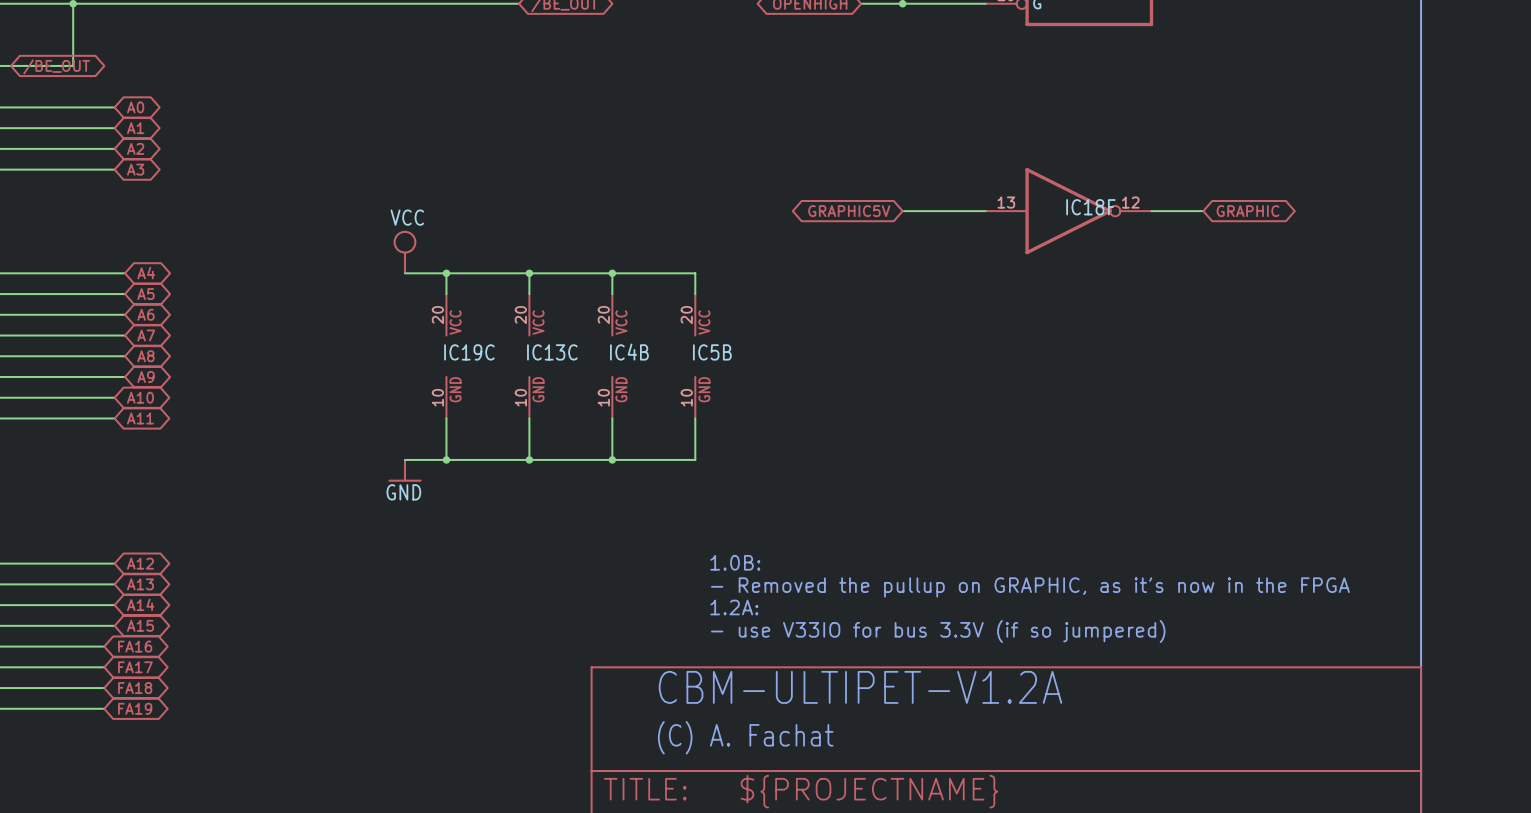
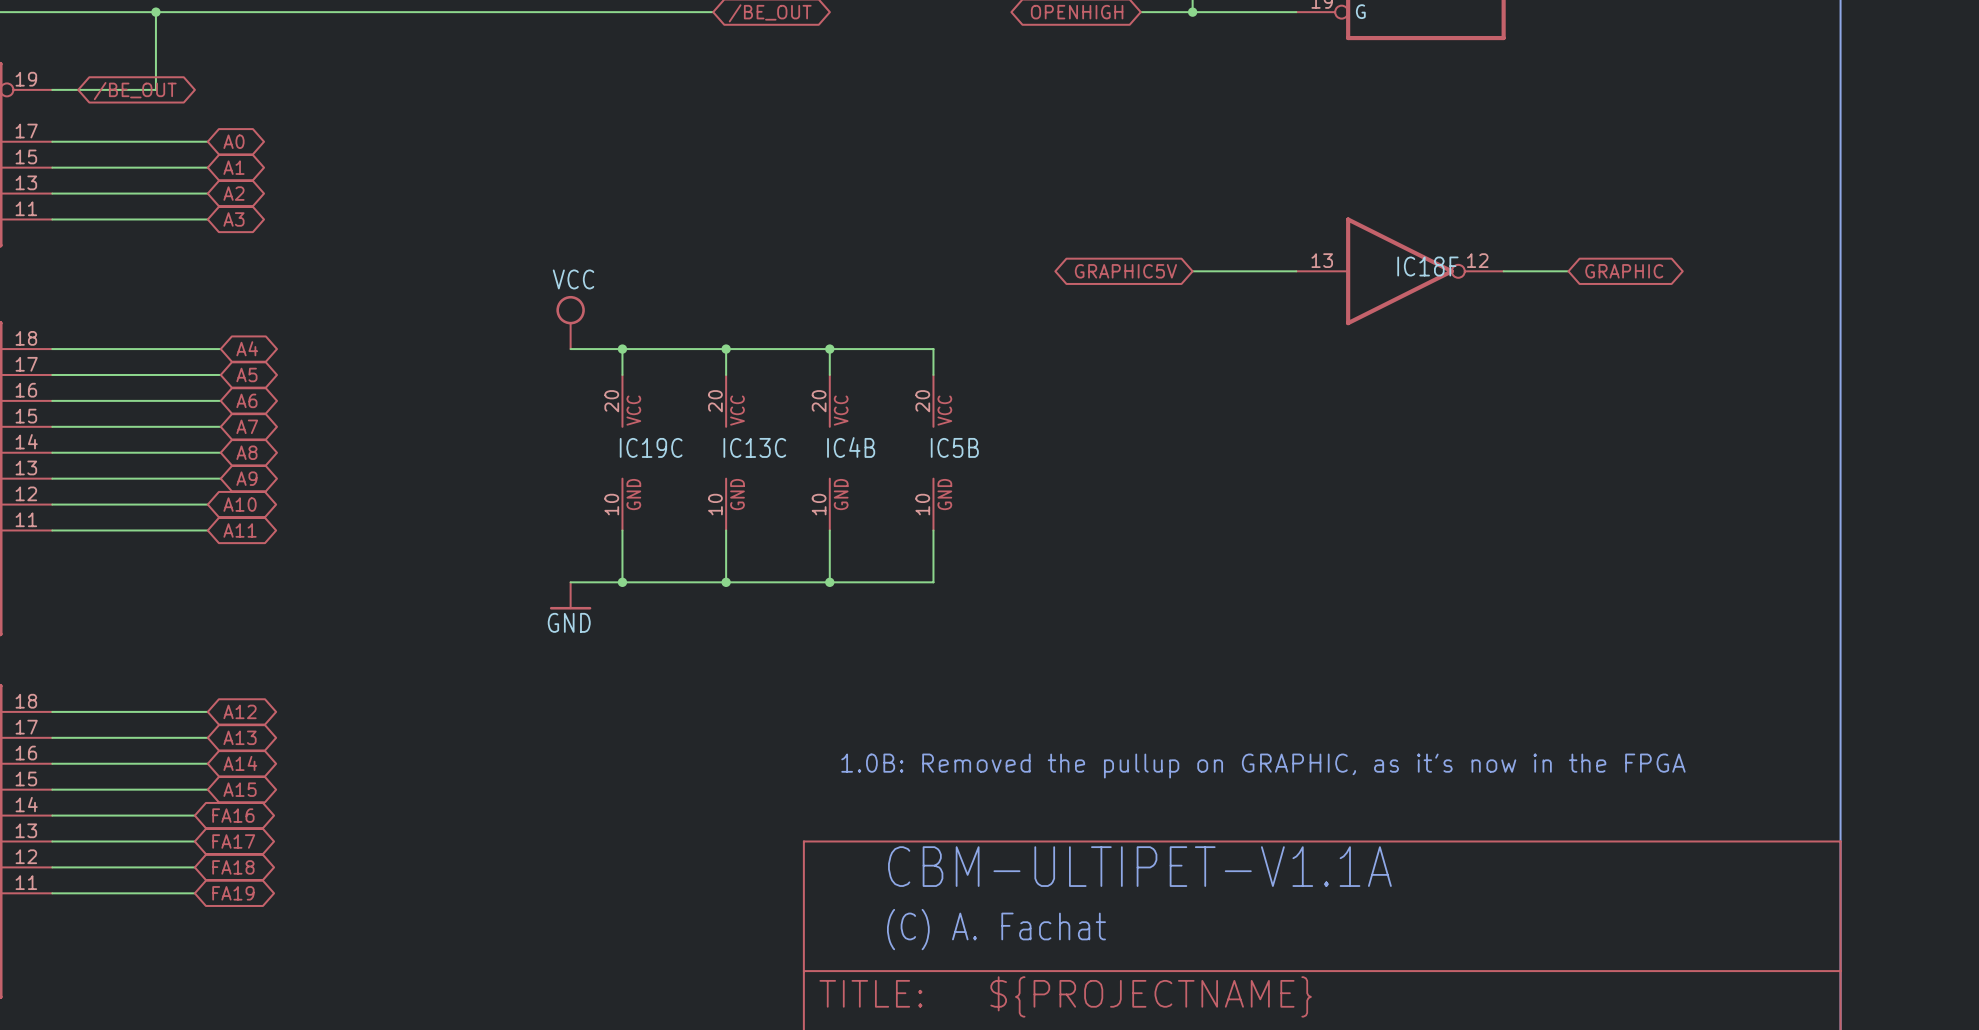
text: 1.0B: (735, 562) -> none
text: - Removed the pullup on GRAPHIC, as it's now in the FPGA (1030, 587) -> none
text: none -> 1.0B: Removed the pullup on GRAPHIC, as it's now in the FPGA (1263, 766)
text: 1.2A: (734, 607) -> none
text: - use V33IO for bus 3.3V (if so jumpered) (938, 631) -> none
text: CBM-ULTIPET-V1.2A (860, 687) -> CBM-ULTIPET-V1.1A (1139, 866)

